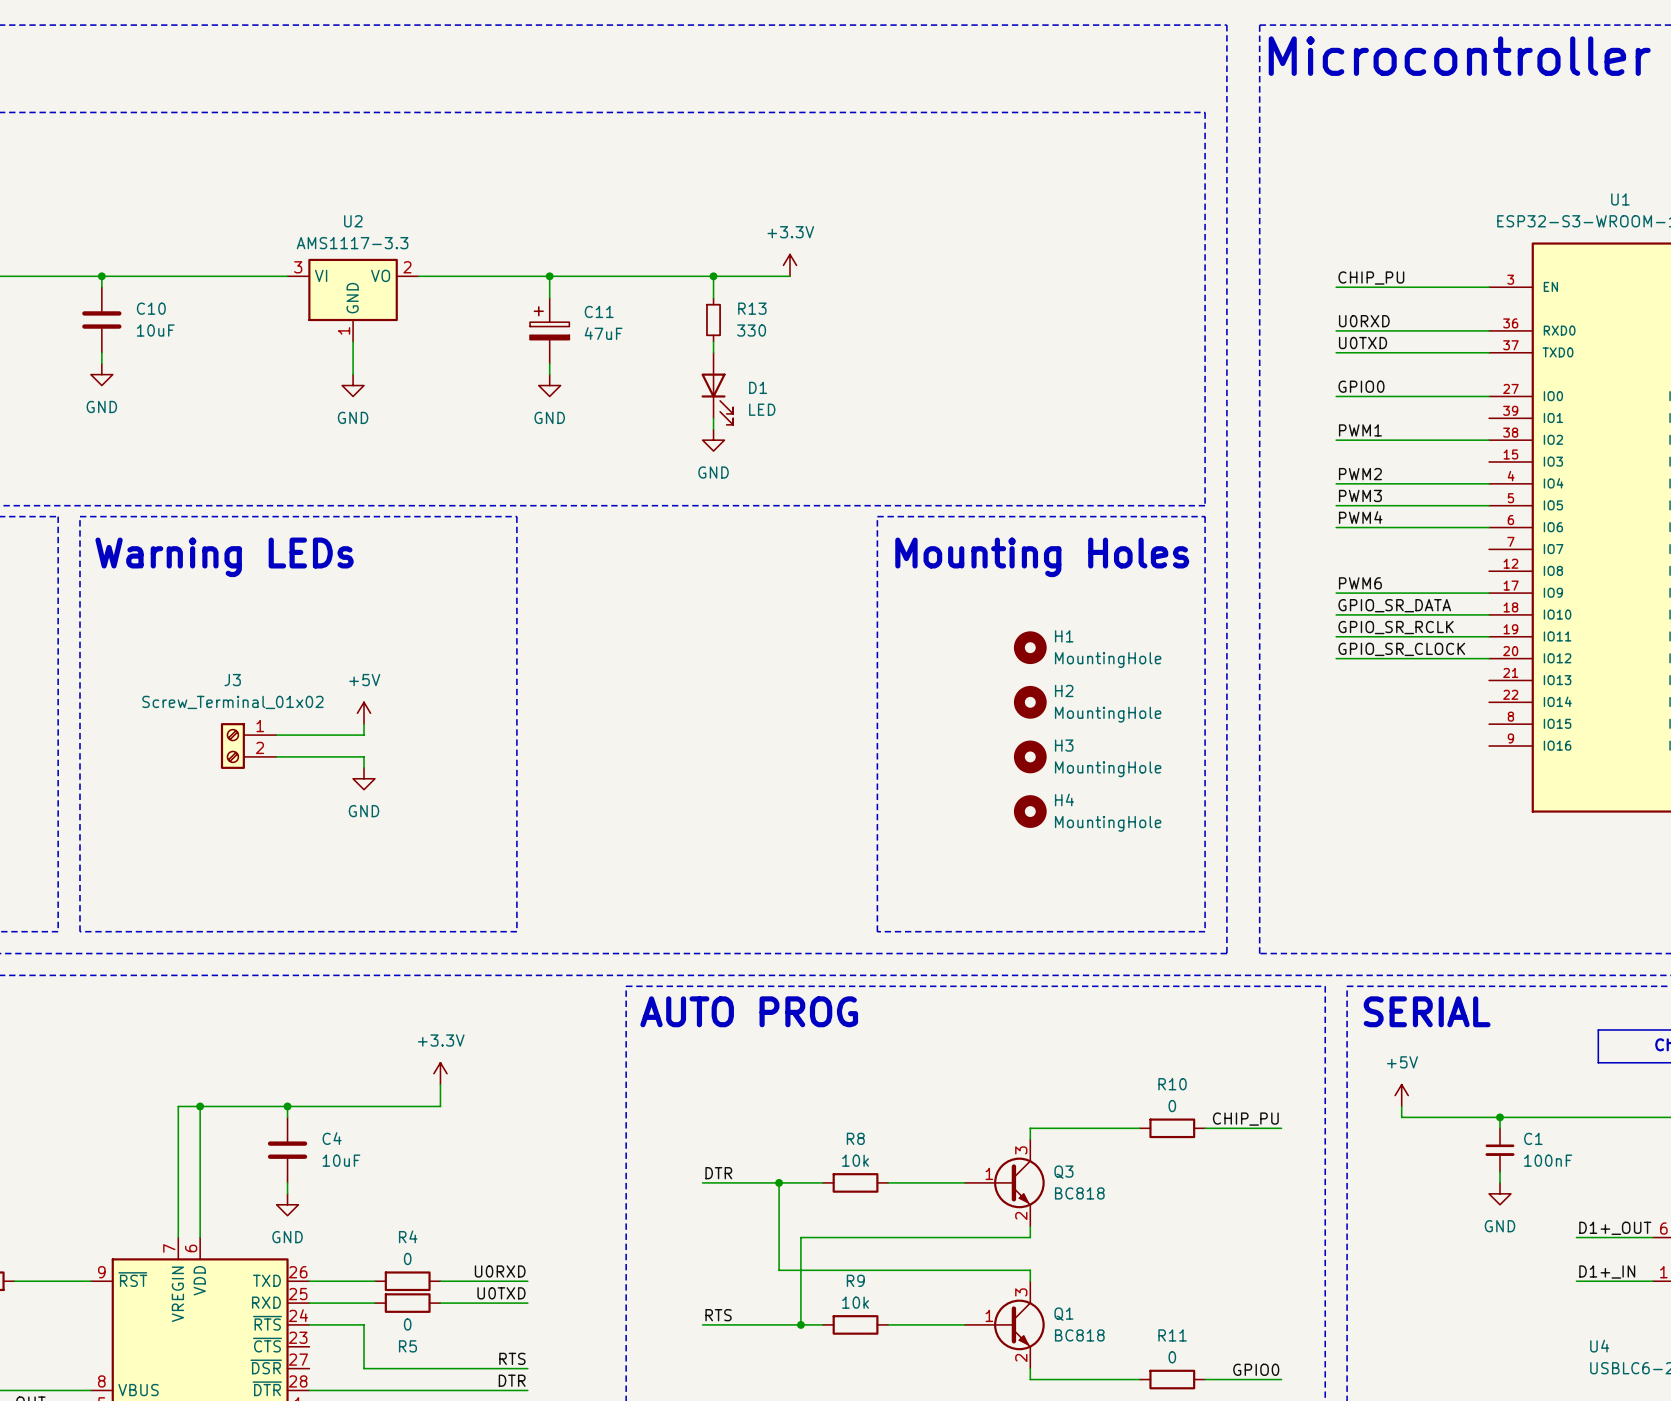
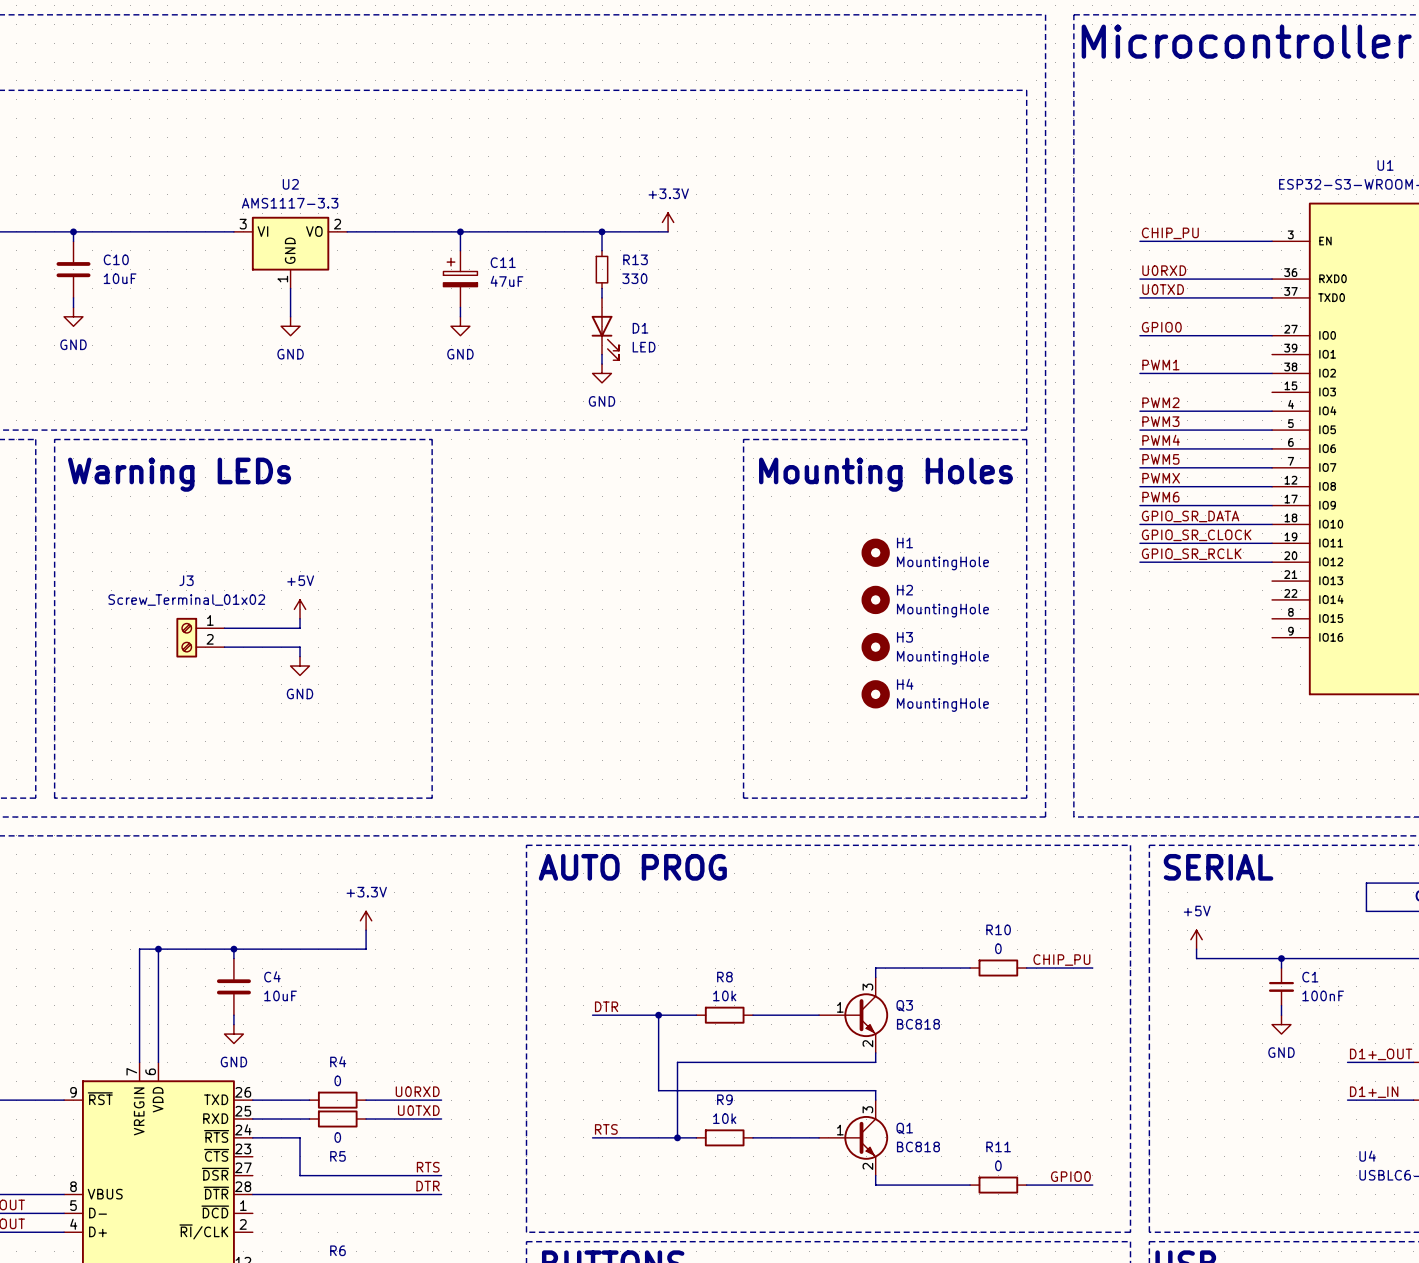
label: none -> PWM5 (1160, 459)
wire: none -> (1139, 467) (1272, 467)
label: none -> PWMX (1161, 478)
wire: none -> (1139, 486) (1272, 486)
label: GPIO_SR_RCLK (1396, 627) -> GPIO_SR_CLOCK (1196, 535)
label: GPIO_SR_CLOCK (1401, 649) -> GPIO_SR_RCLK (1191, 554)

